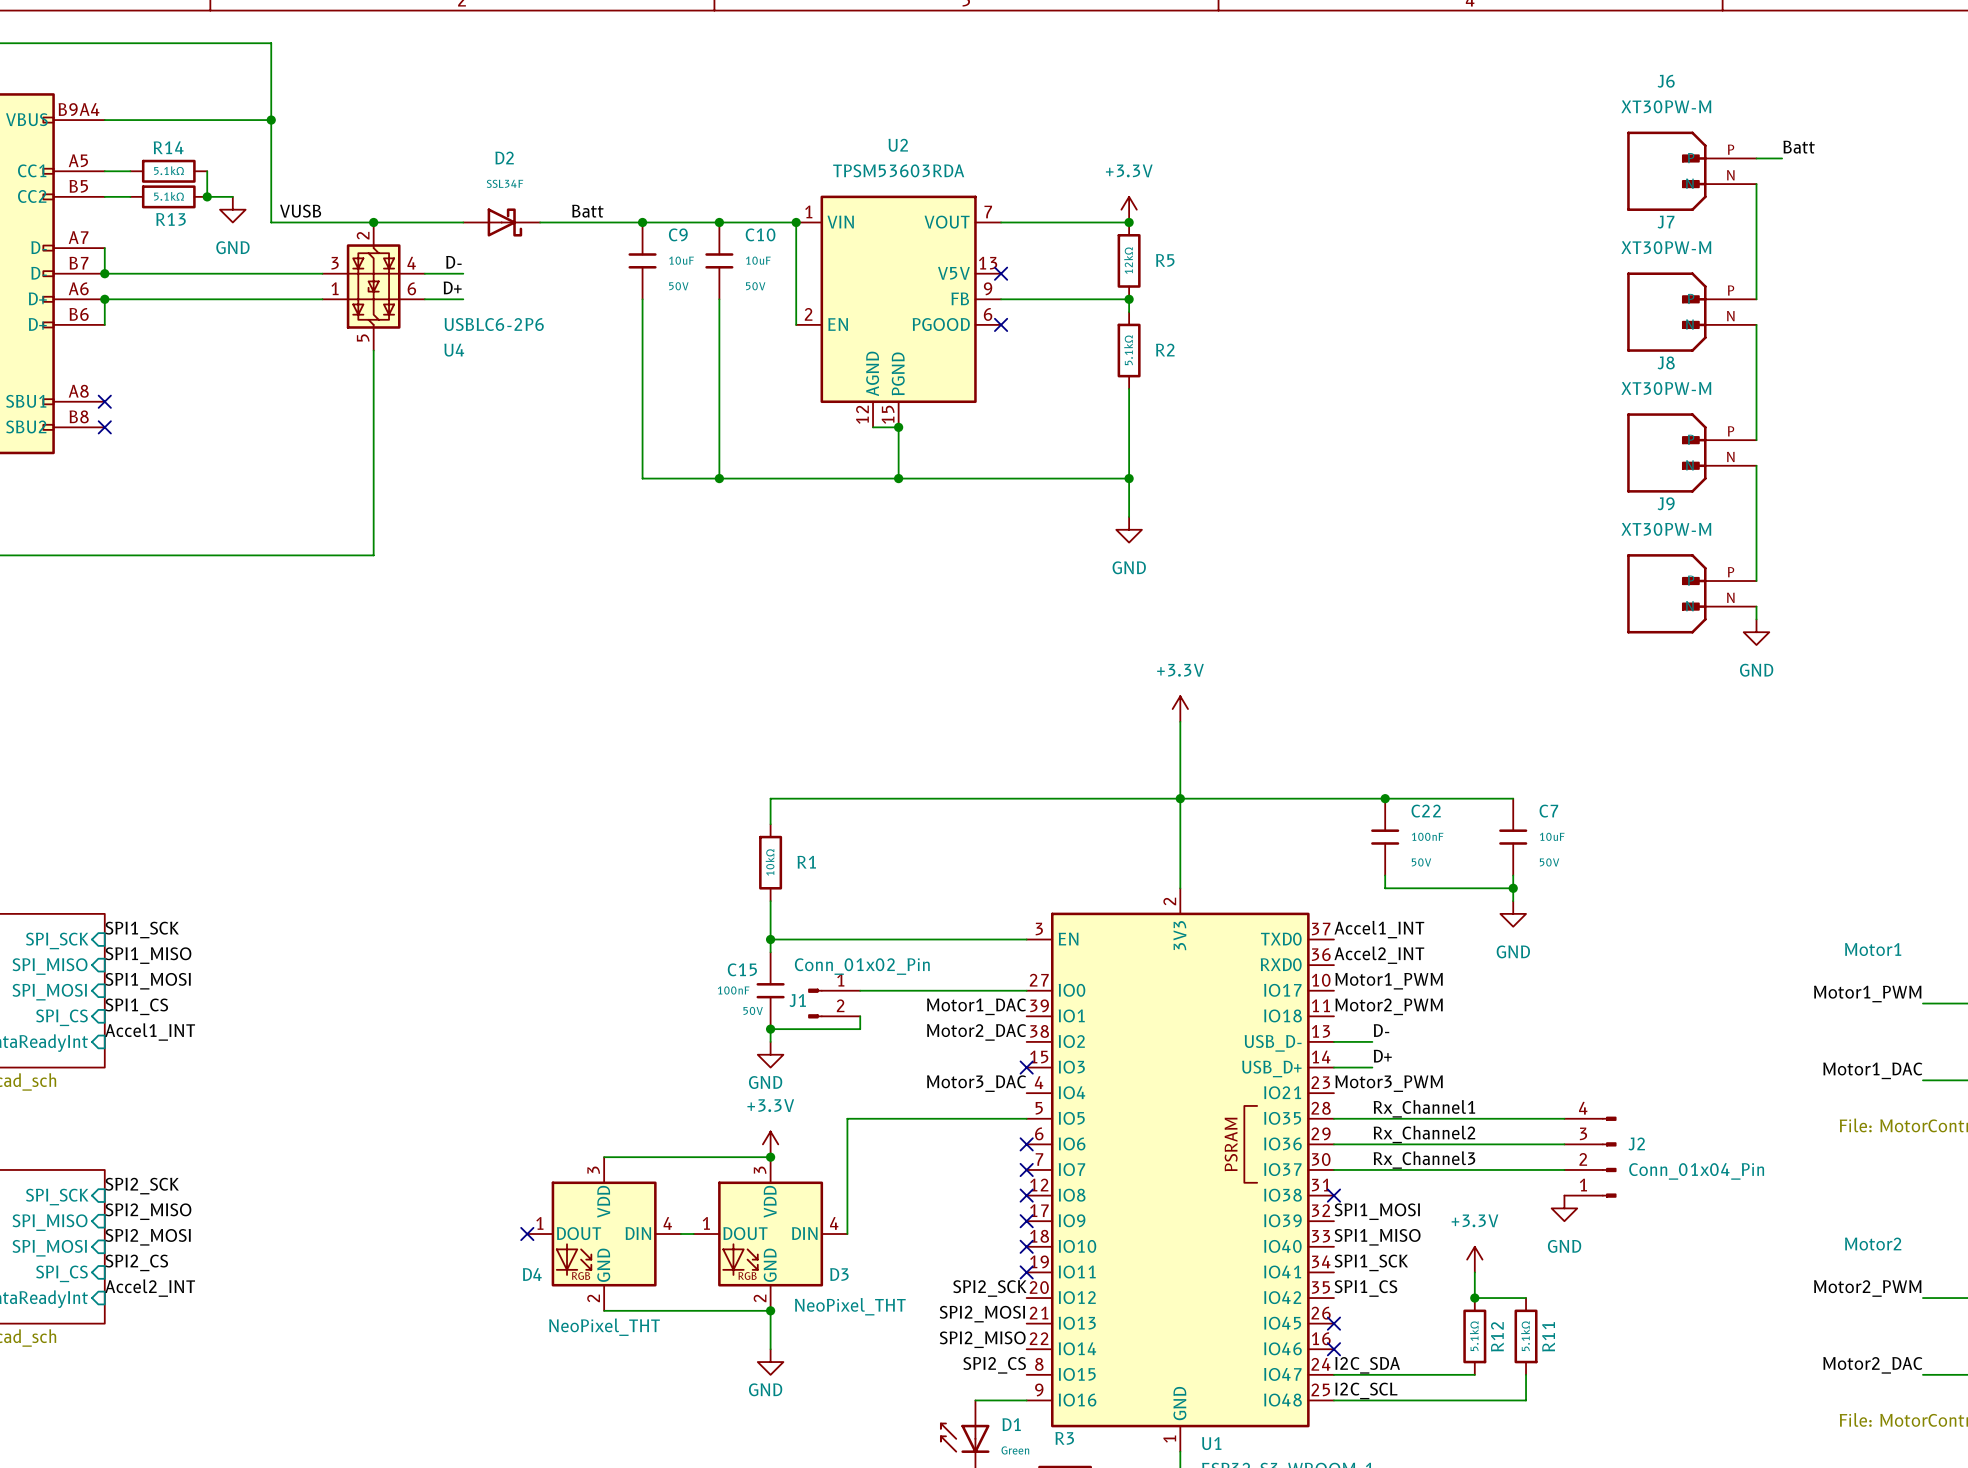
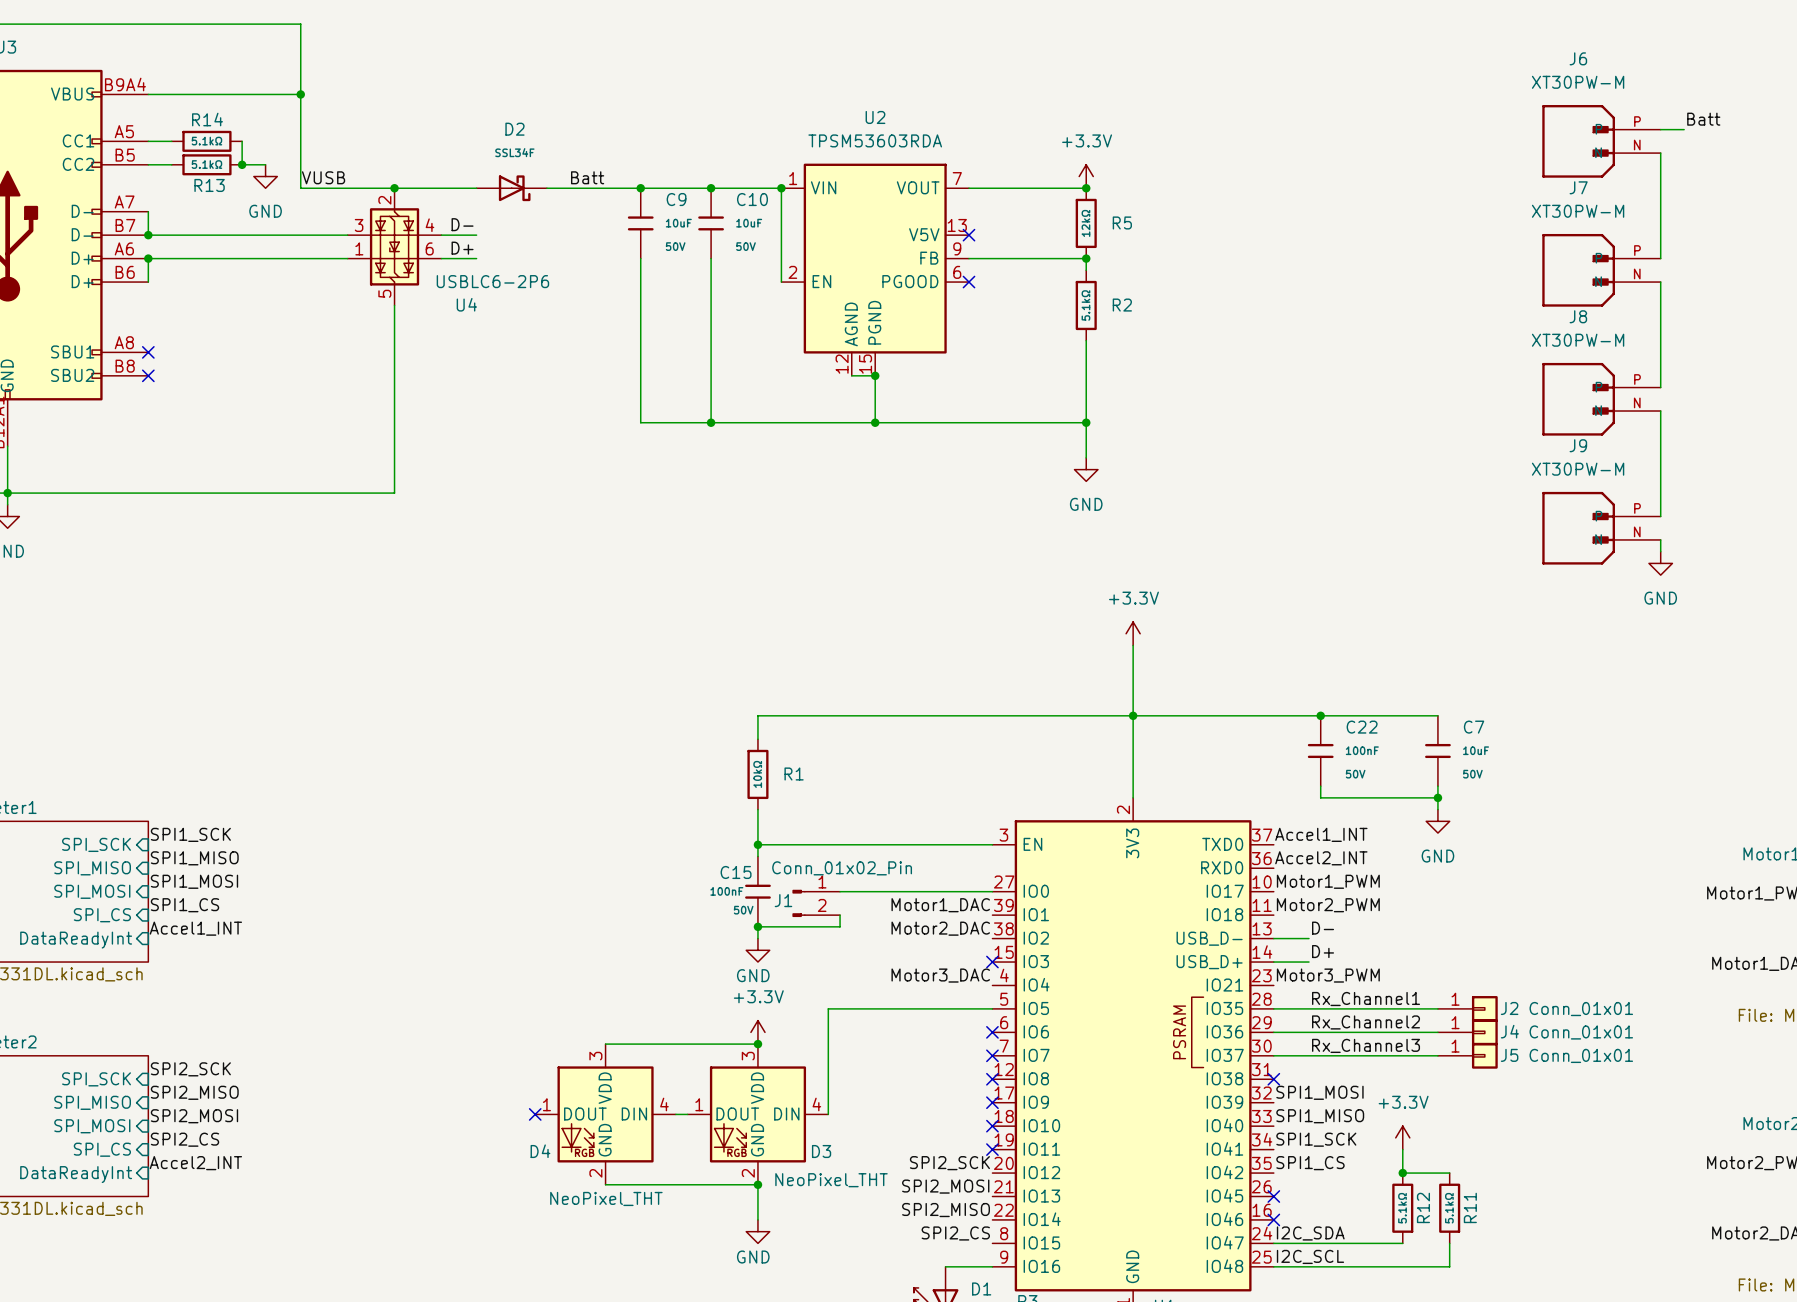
J2 symbol: [1564, 1116, 1617, 1198] -> [1437, 996, 1498, 1022]
J4: none -> Conn_01x01 (1467, 1032)
J5: none -> Conn_01x01 (1467, 1055)
J2 value: Conn_01x04_Pin (1696, 1171) -> Conn_01x01 (1581, 1009)
power symbol: GND (1564, 1208) -> none

